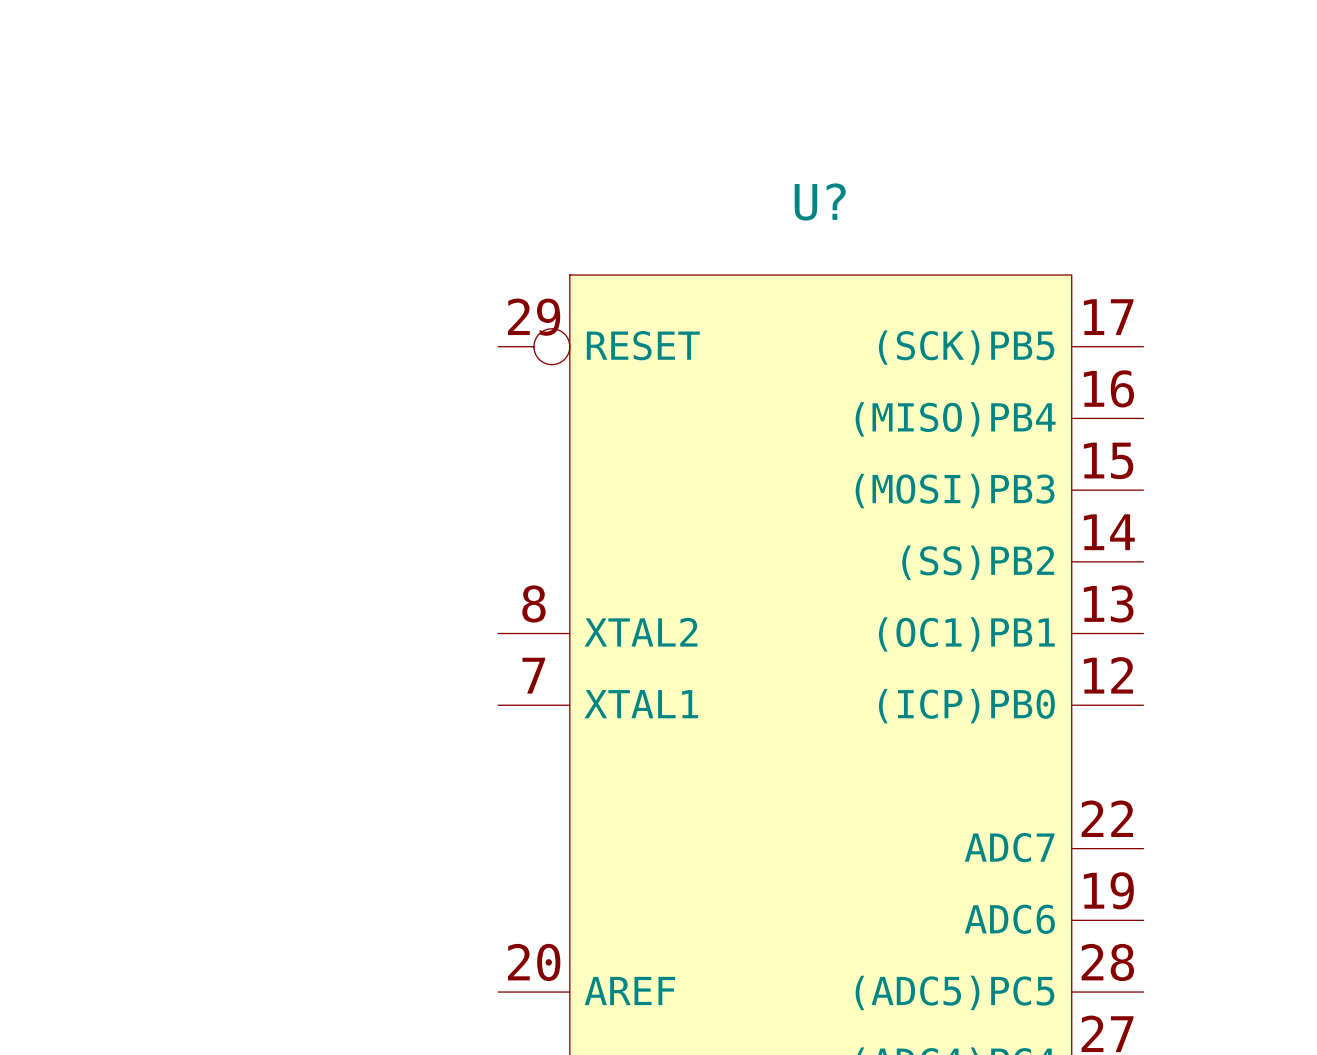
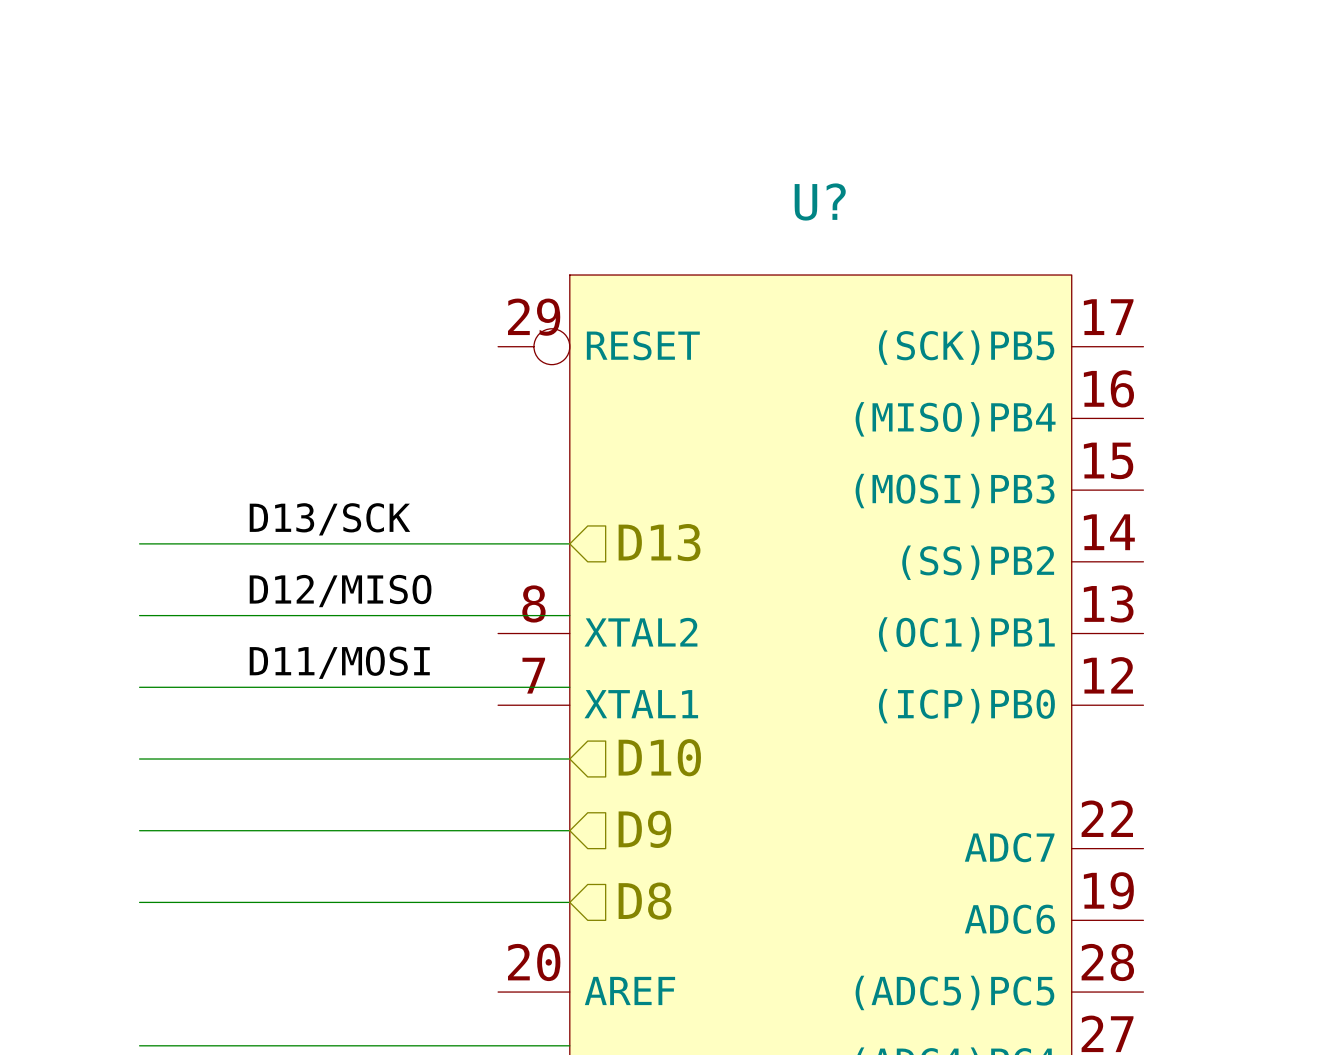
label: none -> D13/SCK (329, 519)
hierarchical label: none -> D13 (659, 542)
wire: none -> (139, 543) (569, 543)
label: none -> D12/MISO (340, 591)
wire: none -> (139, 615) (569, 615)
label: none -> D11/MOSI (339, 662)
wire: none -> (139, 687) (569, 687)
hierarchical label: none -> D10 (659, 757)
wire: none -> (139, 759) (569, 759)
hierarchical label: none -> D9 (644, 829)
wire: none -> (139, 830) (569, 830)
hierarchical label: none -> D8 (645, 901)
wire: none -> (139, 902) (569, 902)
wire: none -> (139, 1045) (569, 1045)

